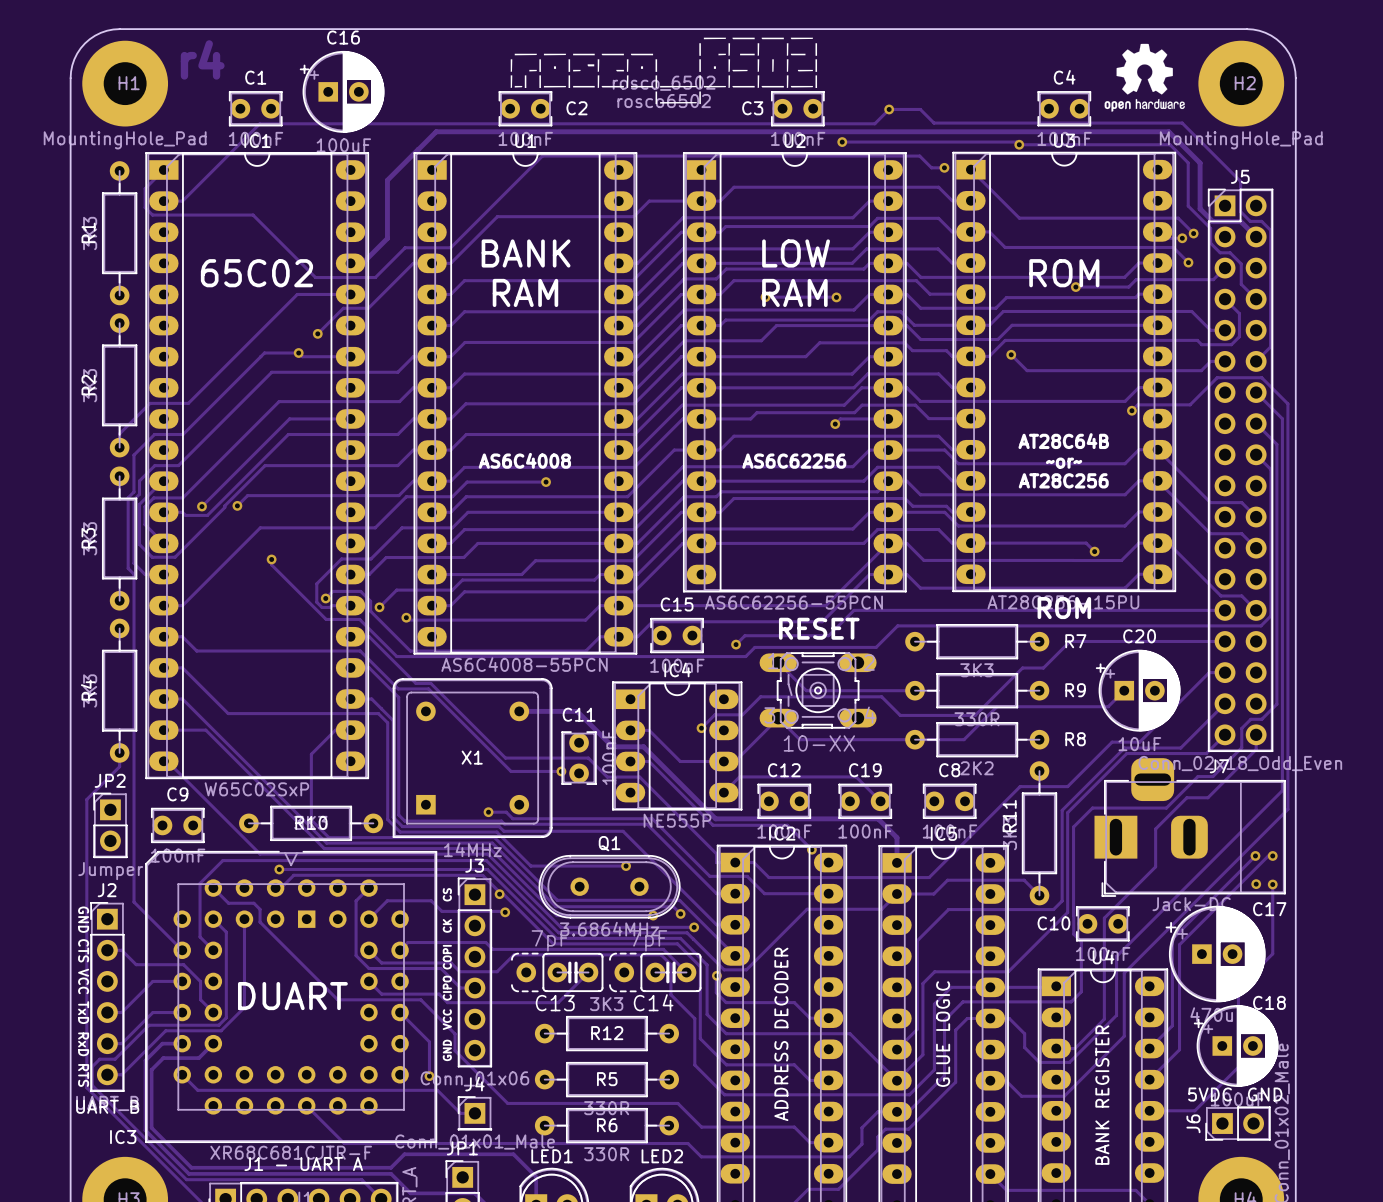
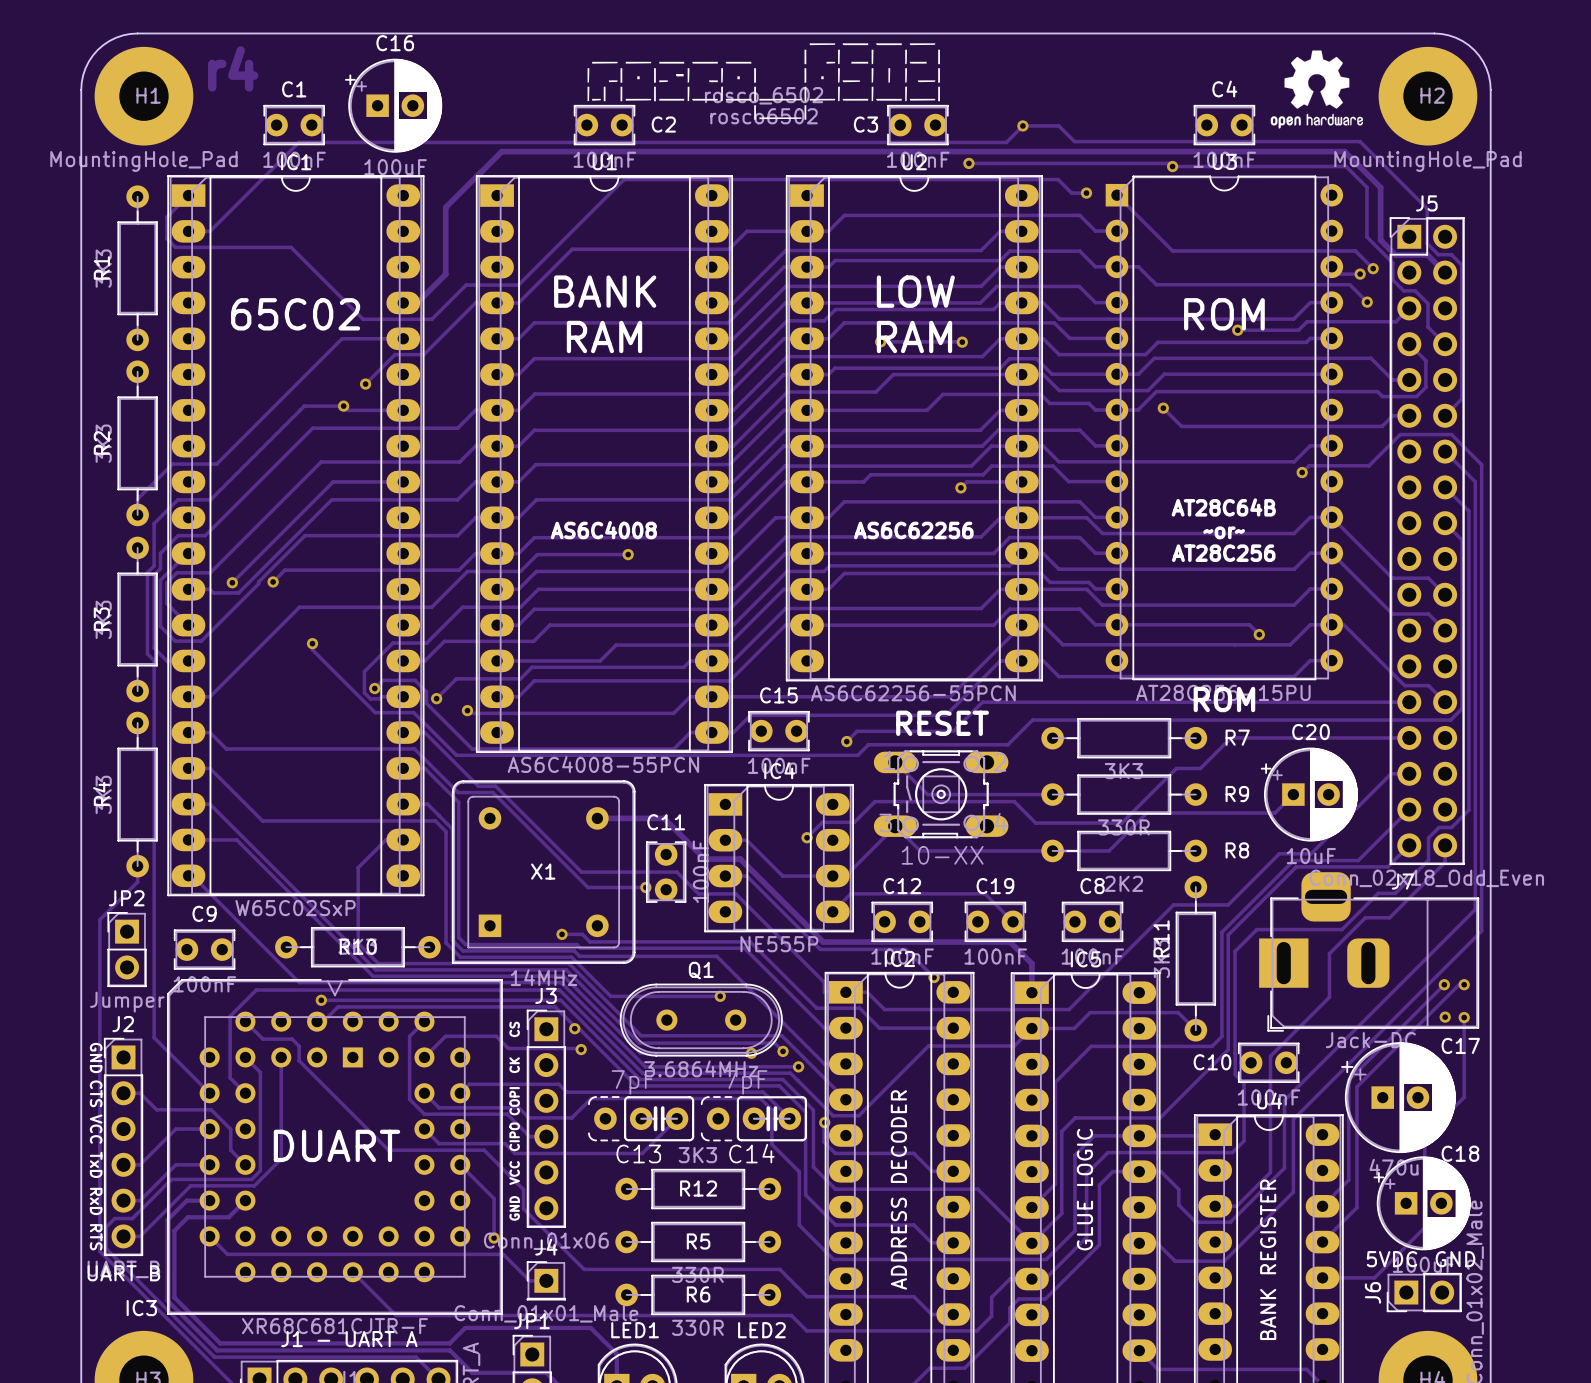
U3 footprint: [952, 151, 1177, 592] -> [1105, 175, 1344, 681]

